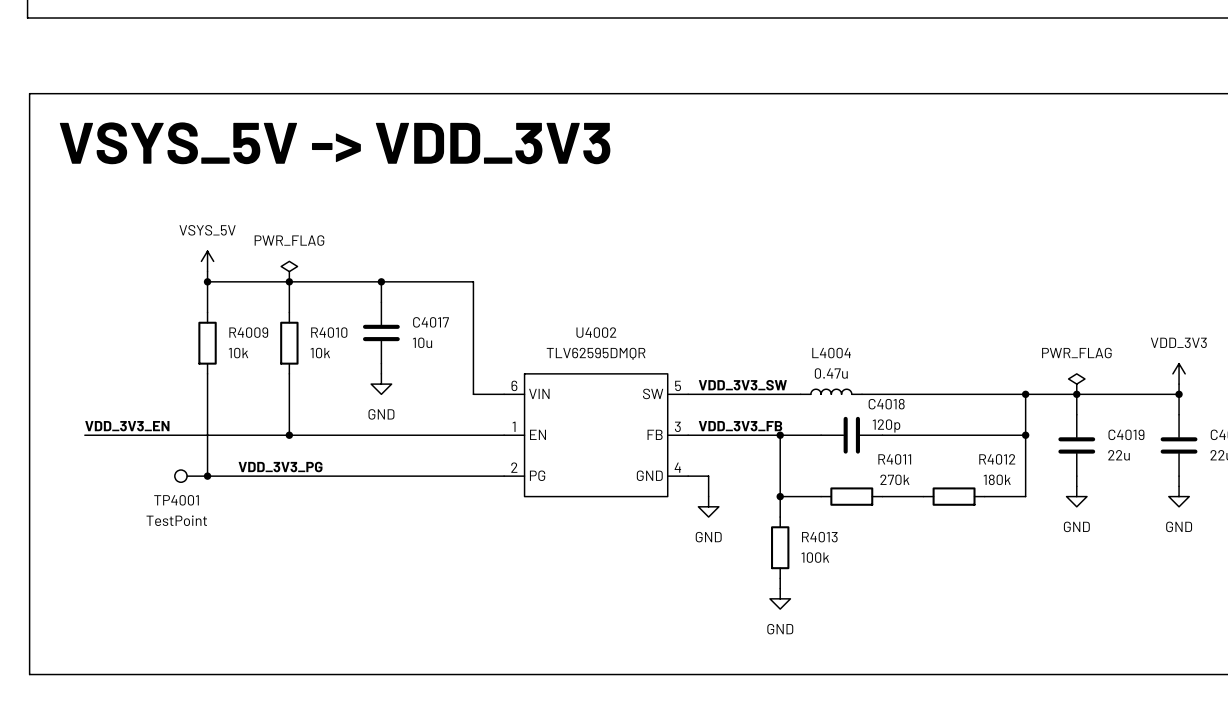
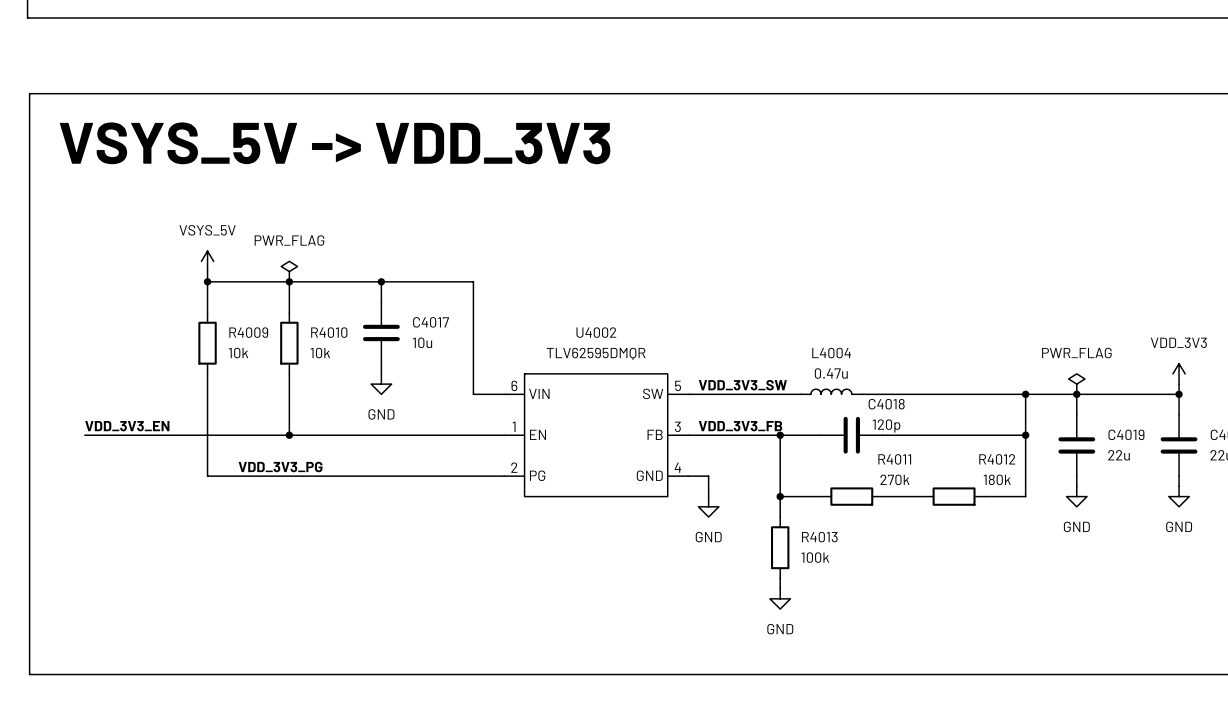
TP4001: TestPoint (191, 476) -> none
junction: (207, 476) -> none

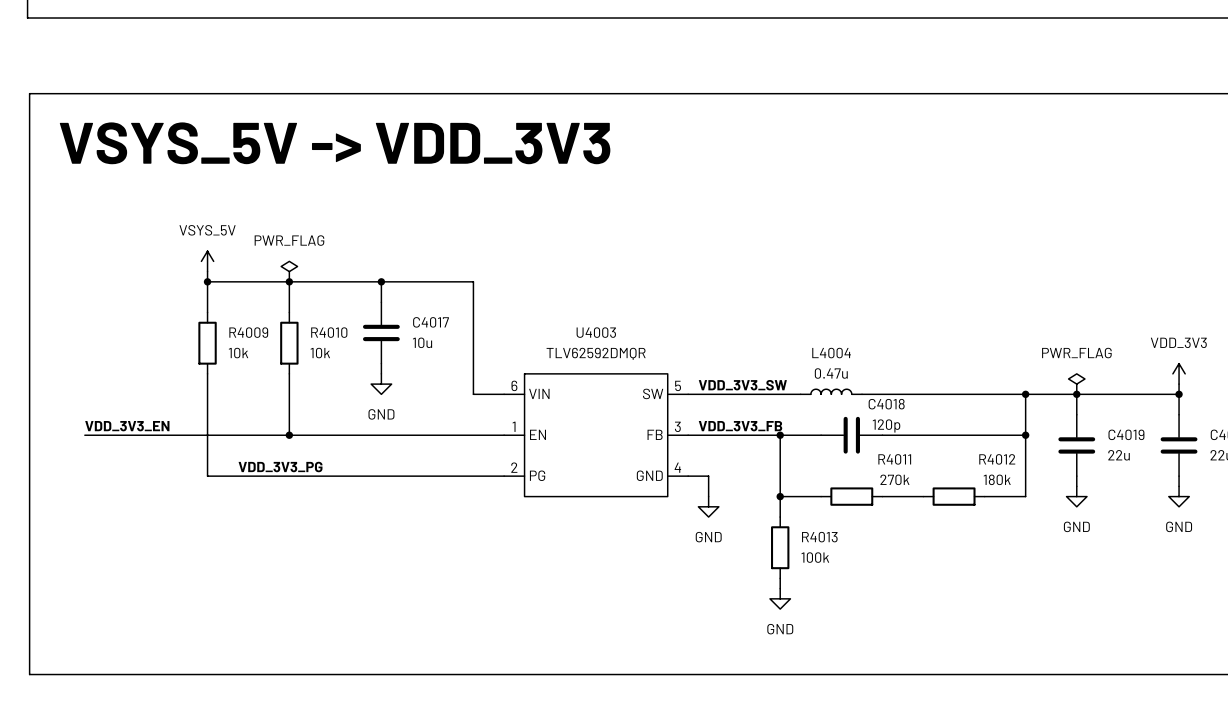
U4002 name: U4002 (596, 332) -> U4003 (596, 332)
U4002 value: TLV62595DMQR (596, 353) -> TLV62592DMQR (596, 353)

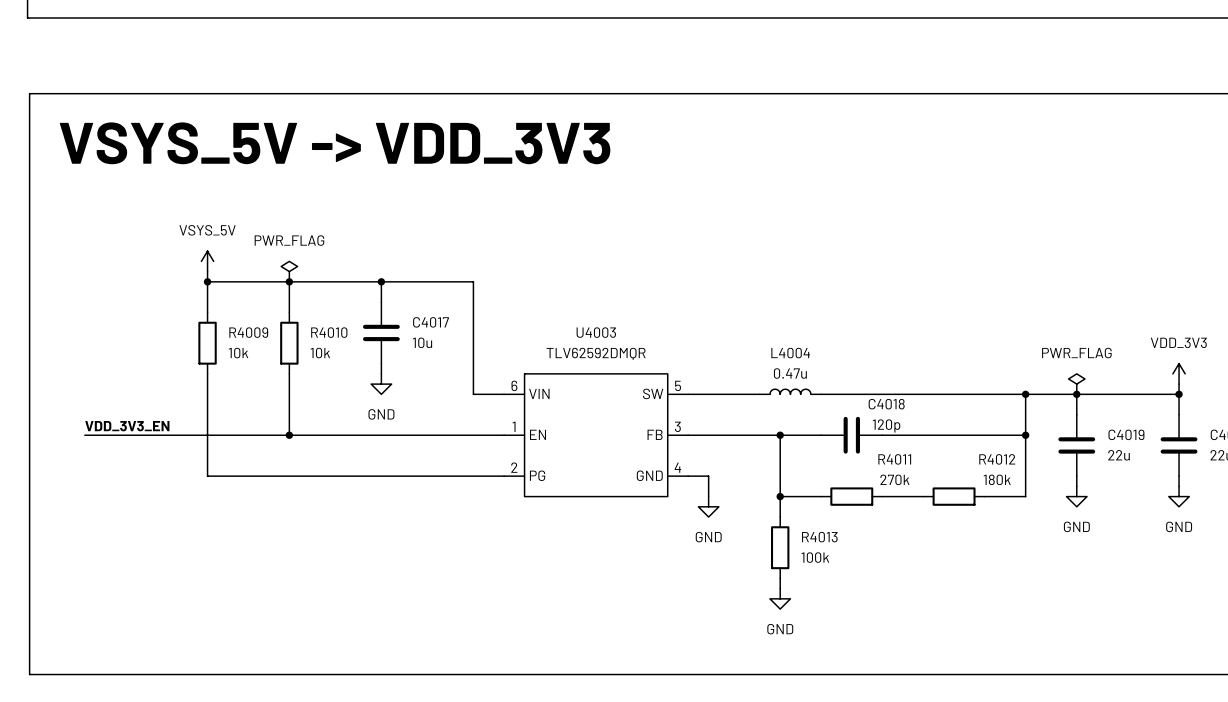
label: VDD_3V3_SW (742, 385) -> none
L4004 position: (831, 391) -> (790, 391)
wire: (759, 394) (800, 394) -> (821, 394) (862, 394)
label: VDD_3V3_FB (740, 426) -> none
label: VDD_3V3_PG (280, 467) -> none

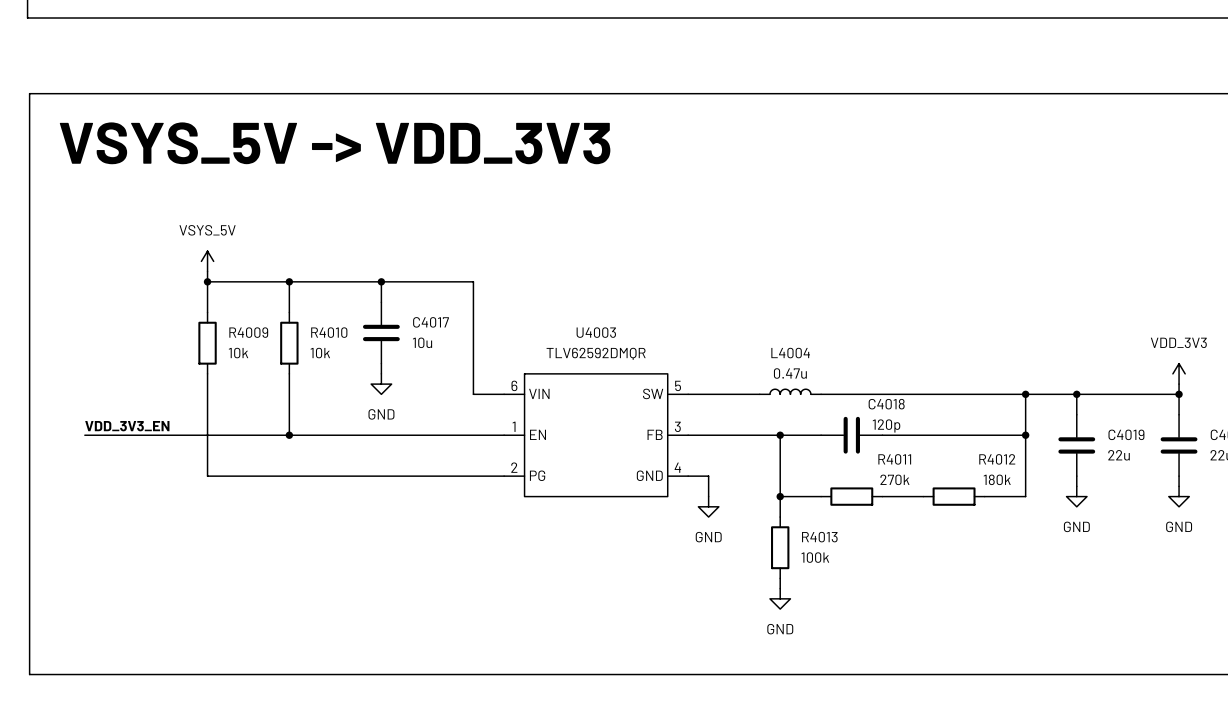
power symbol: PWR_FLAG (289, 271) -> none
power symbol: PWR_FLAG (1076, 384) -> none

